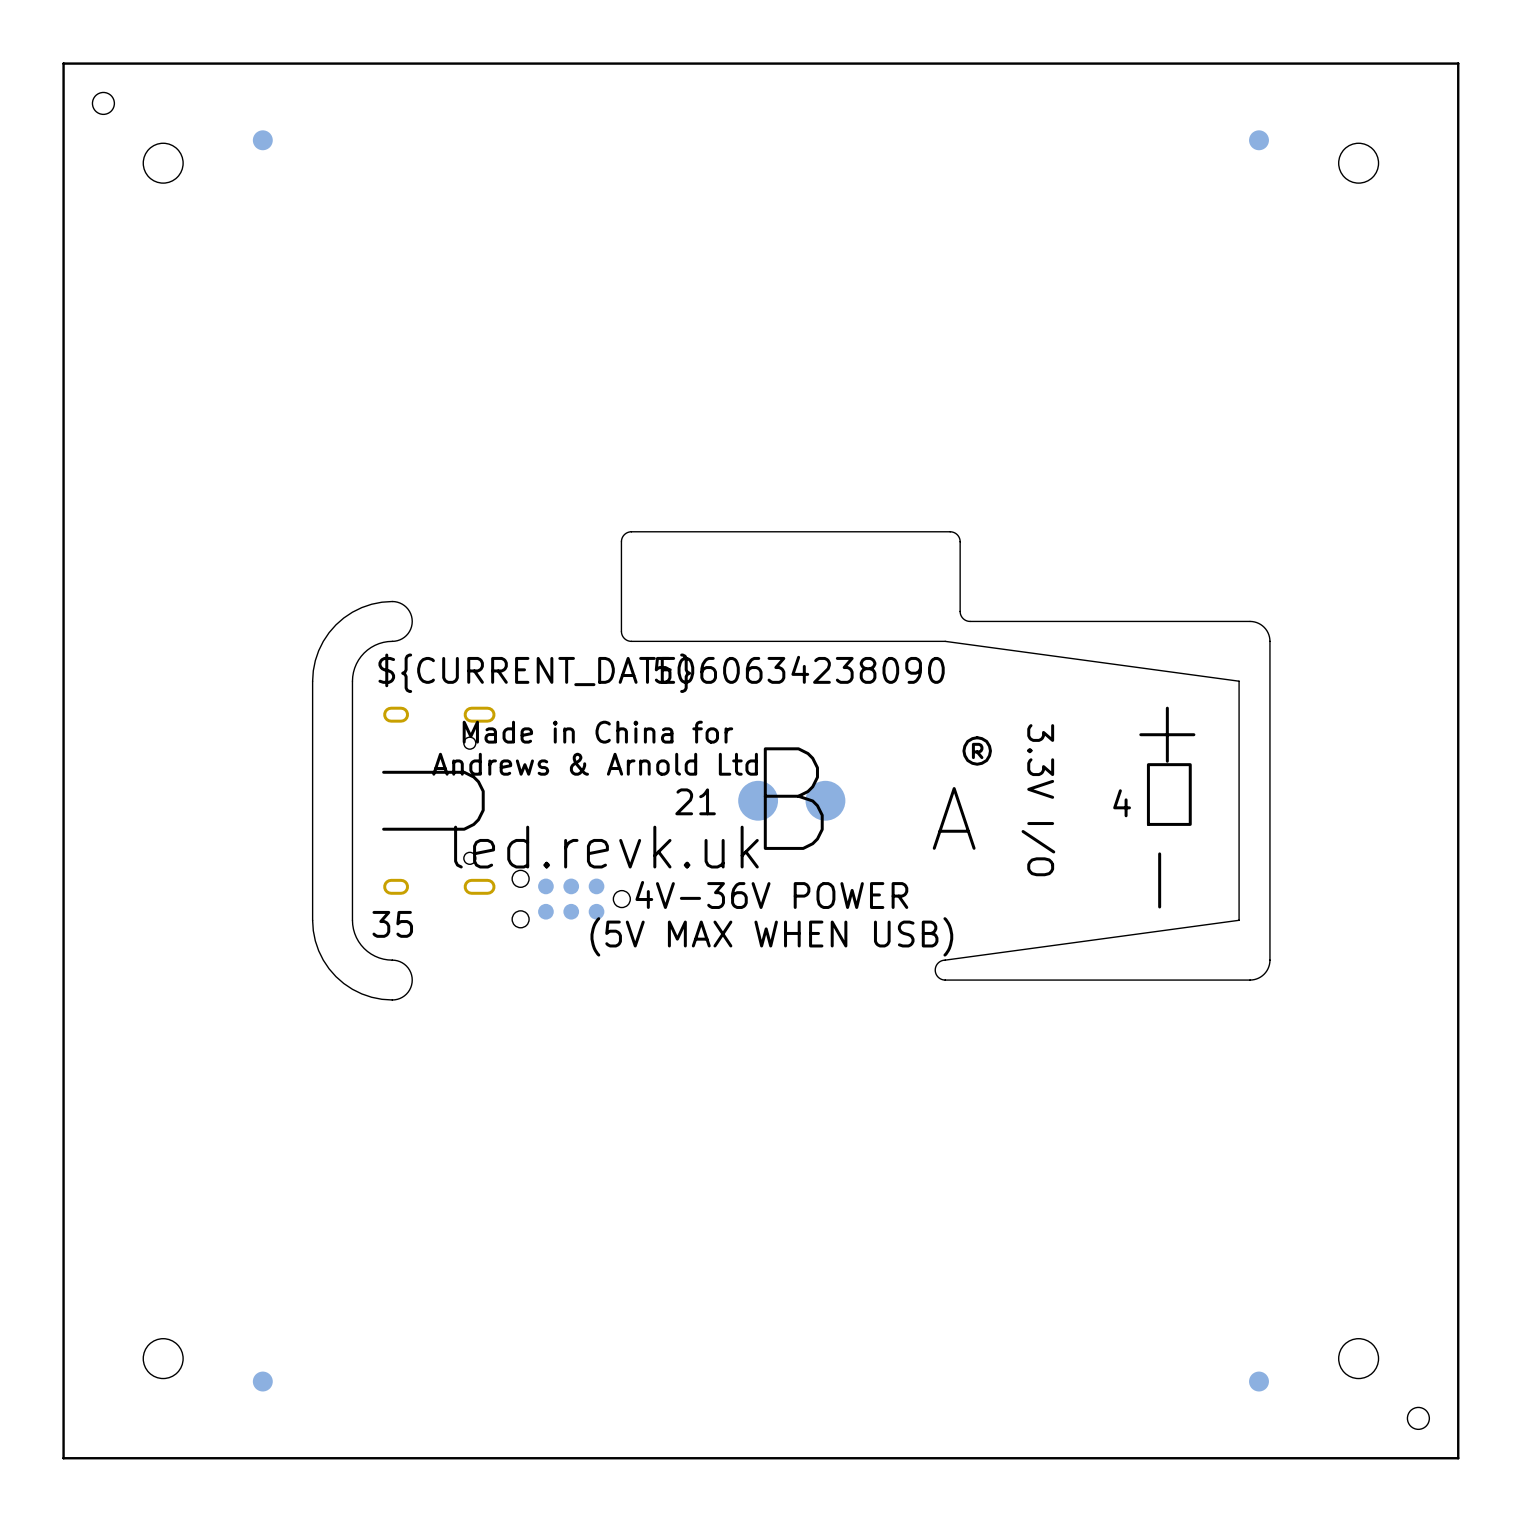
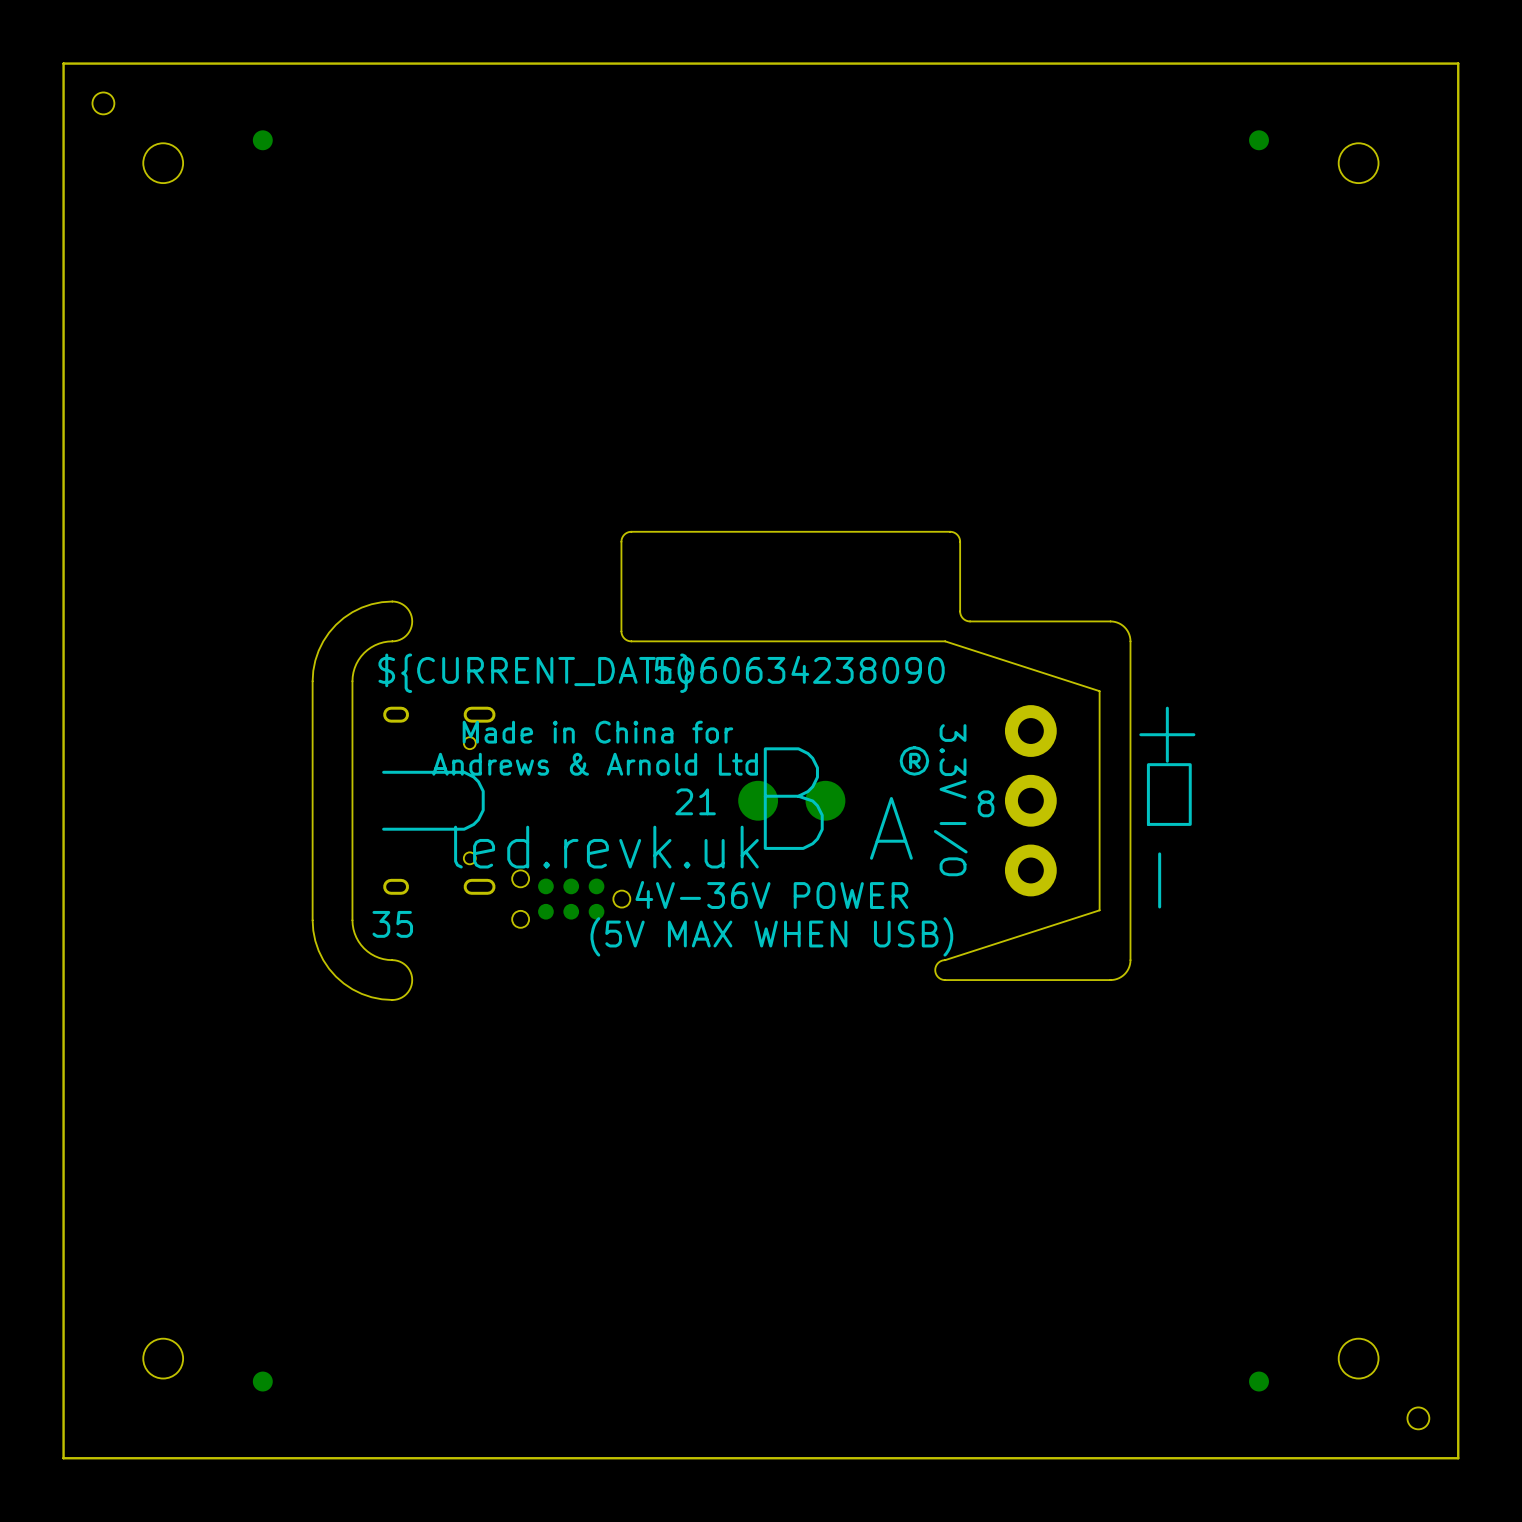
board edge: (1110, 621) (1252, 621) (1265, 628) (1269, 641) (1269, 960) (1267, 968) (1262, 975) (1252, 979) (1110, 980) -> (1110, 621) (1124, 627) (1130, 641) (1130, 962) (1124, 974) (1110, 980)
board edge: (945, 641) (1239, 681) (1239, 920) (945, 960) -> (945, 641) (1099, 691) (1099, 910) (945, 960)
text position: ® (977, 750) -> ® (914, 760)
part: none -> (1030, 800)
text position: 3.3V I/O (1038, 800) -> 3.3V I/O (950, 800)
text: none -> 8 (986, 803)
text: 4 (1122, 803) -> none
text position: A (954, 818) -> A (891, 828)

